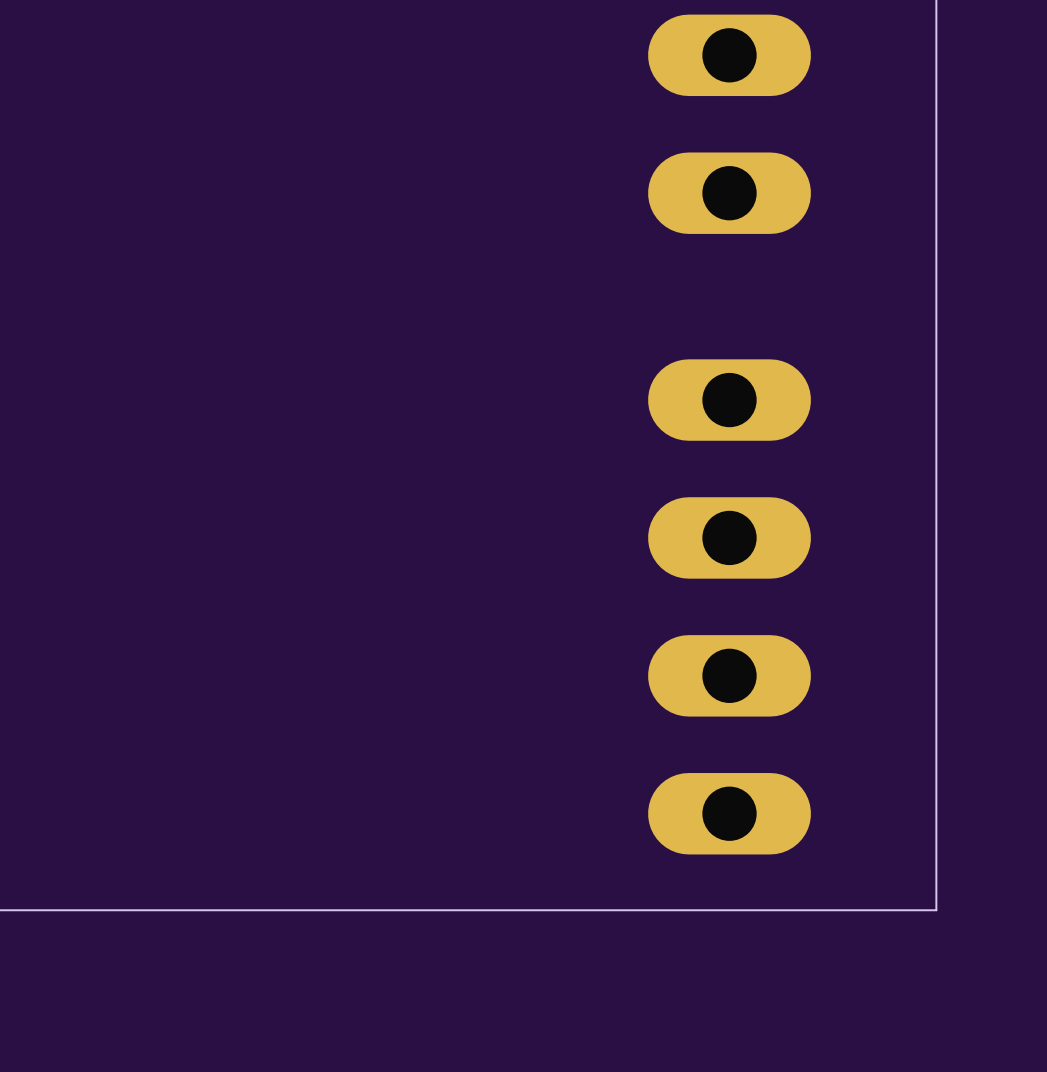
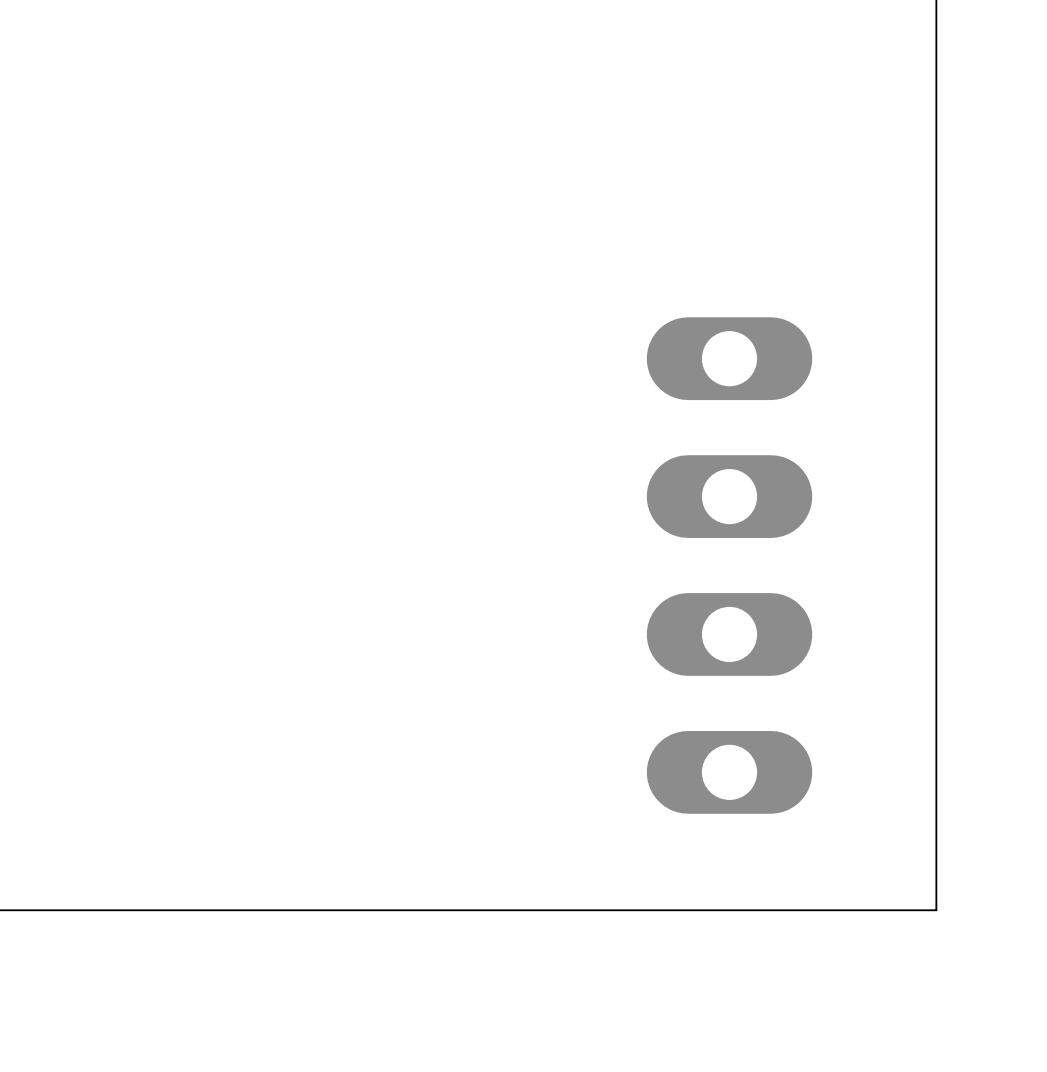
part: (729, 124) -> none
part footprint: [648, 359, 811, 855] -> [646, 317, 813, 814]

